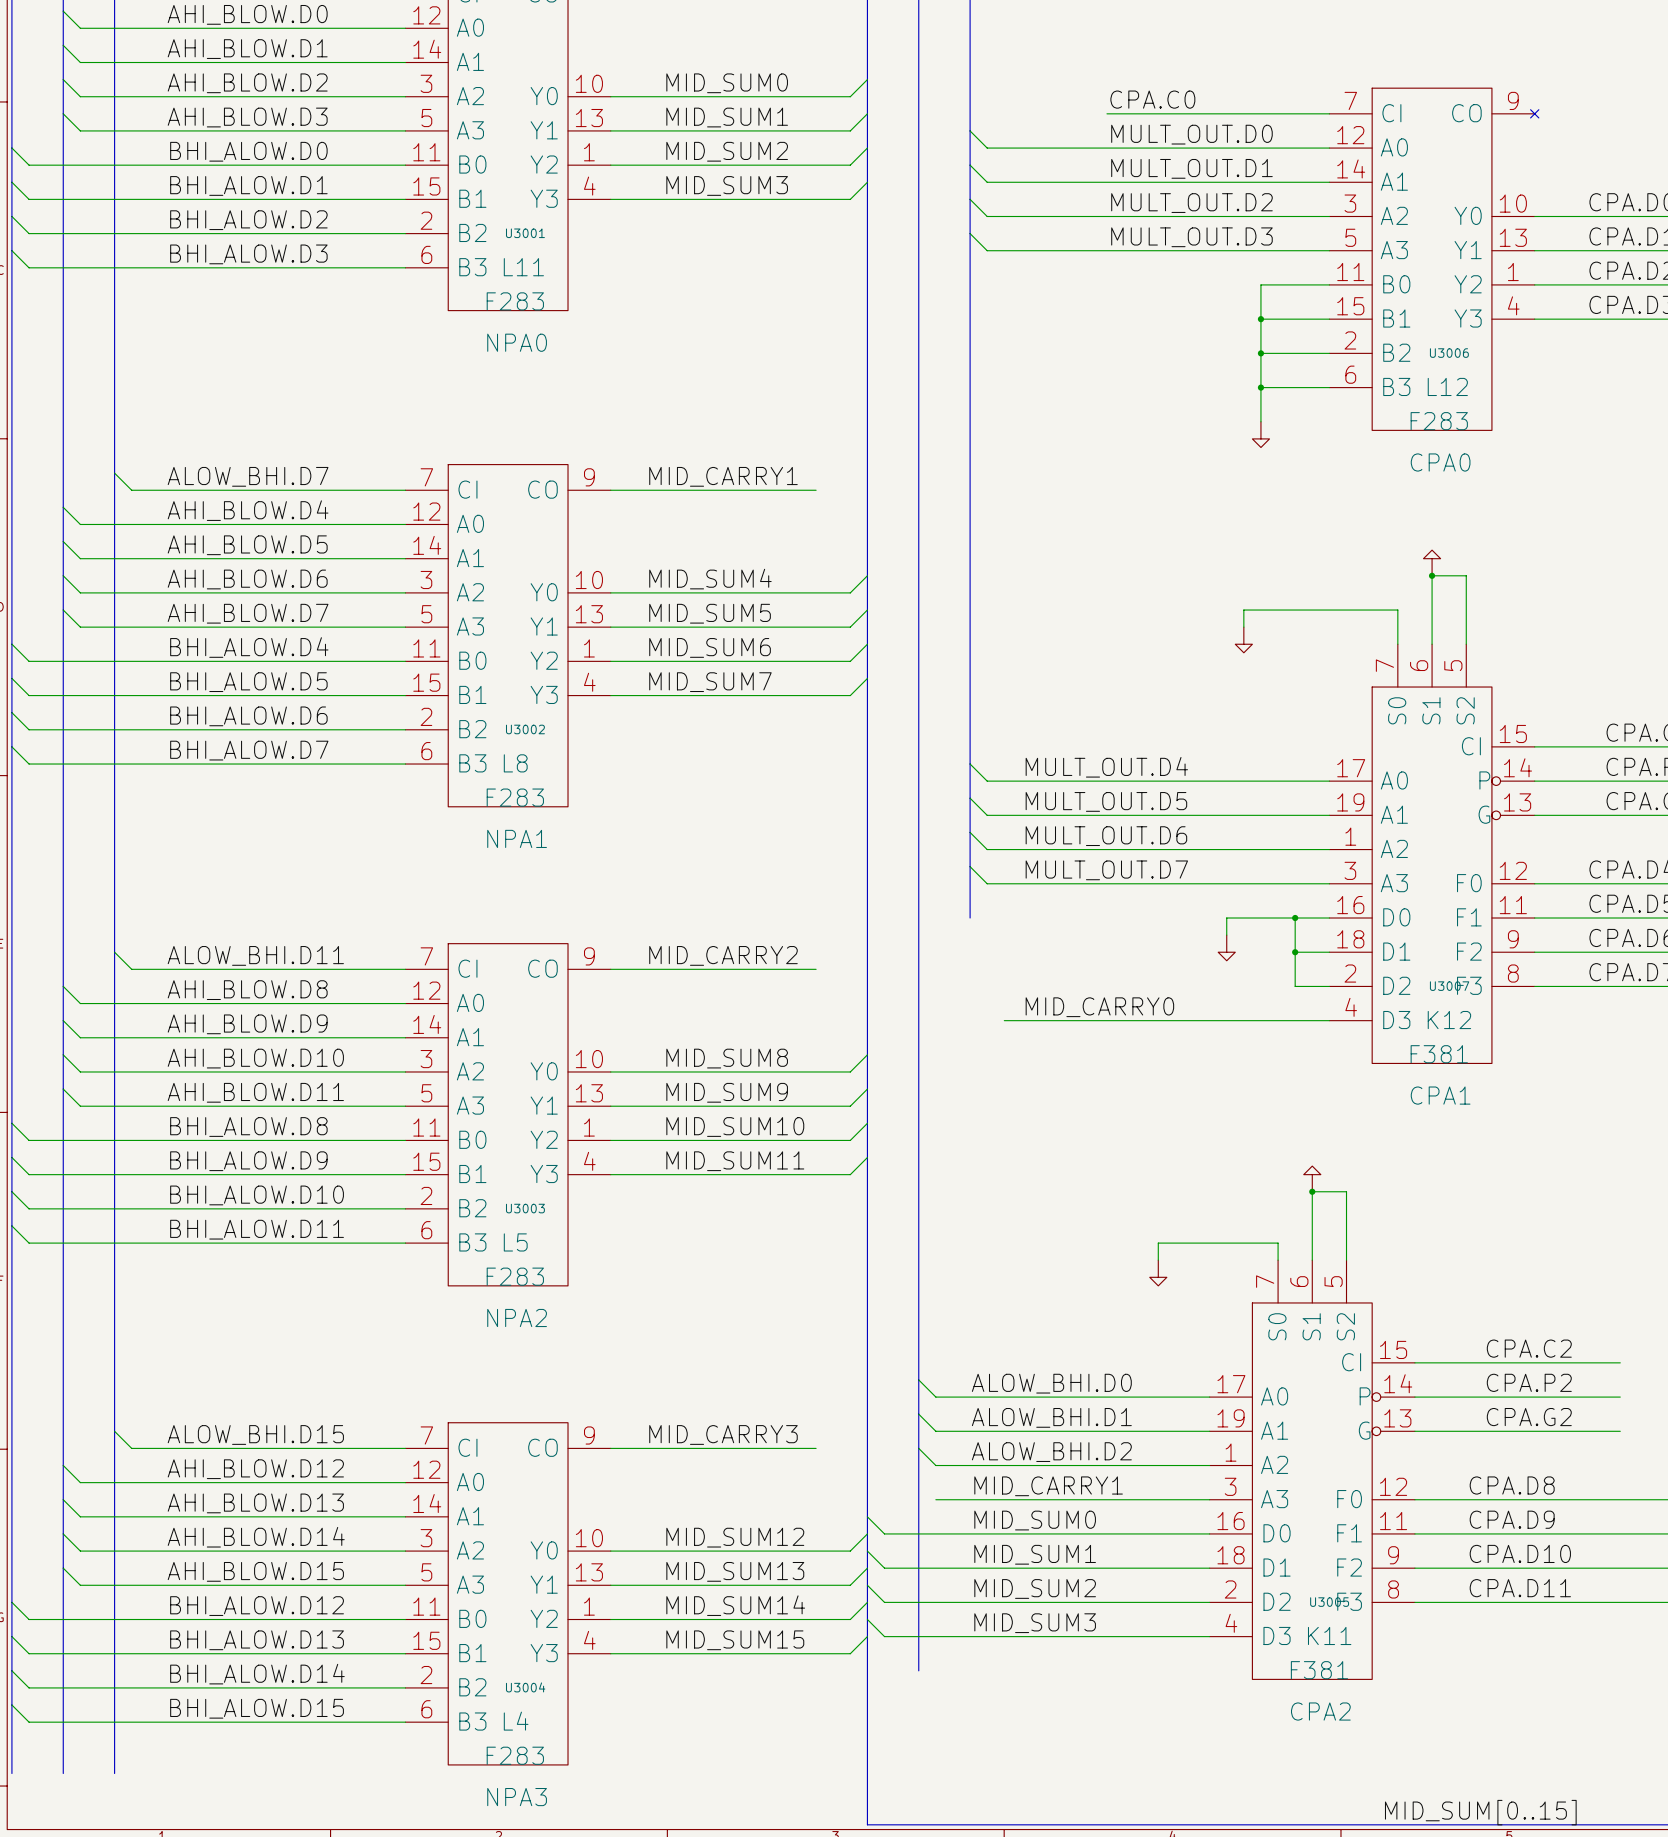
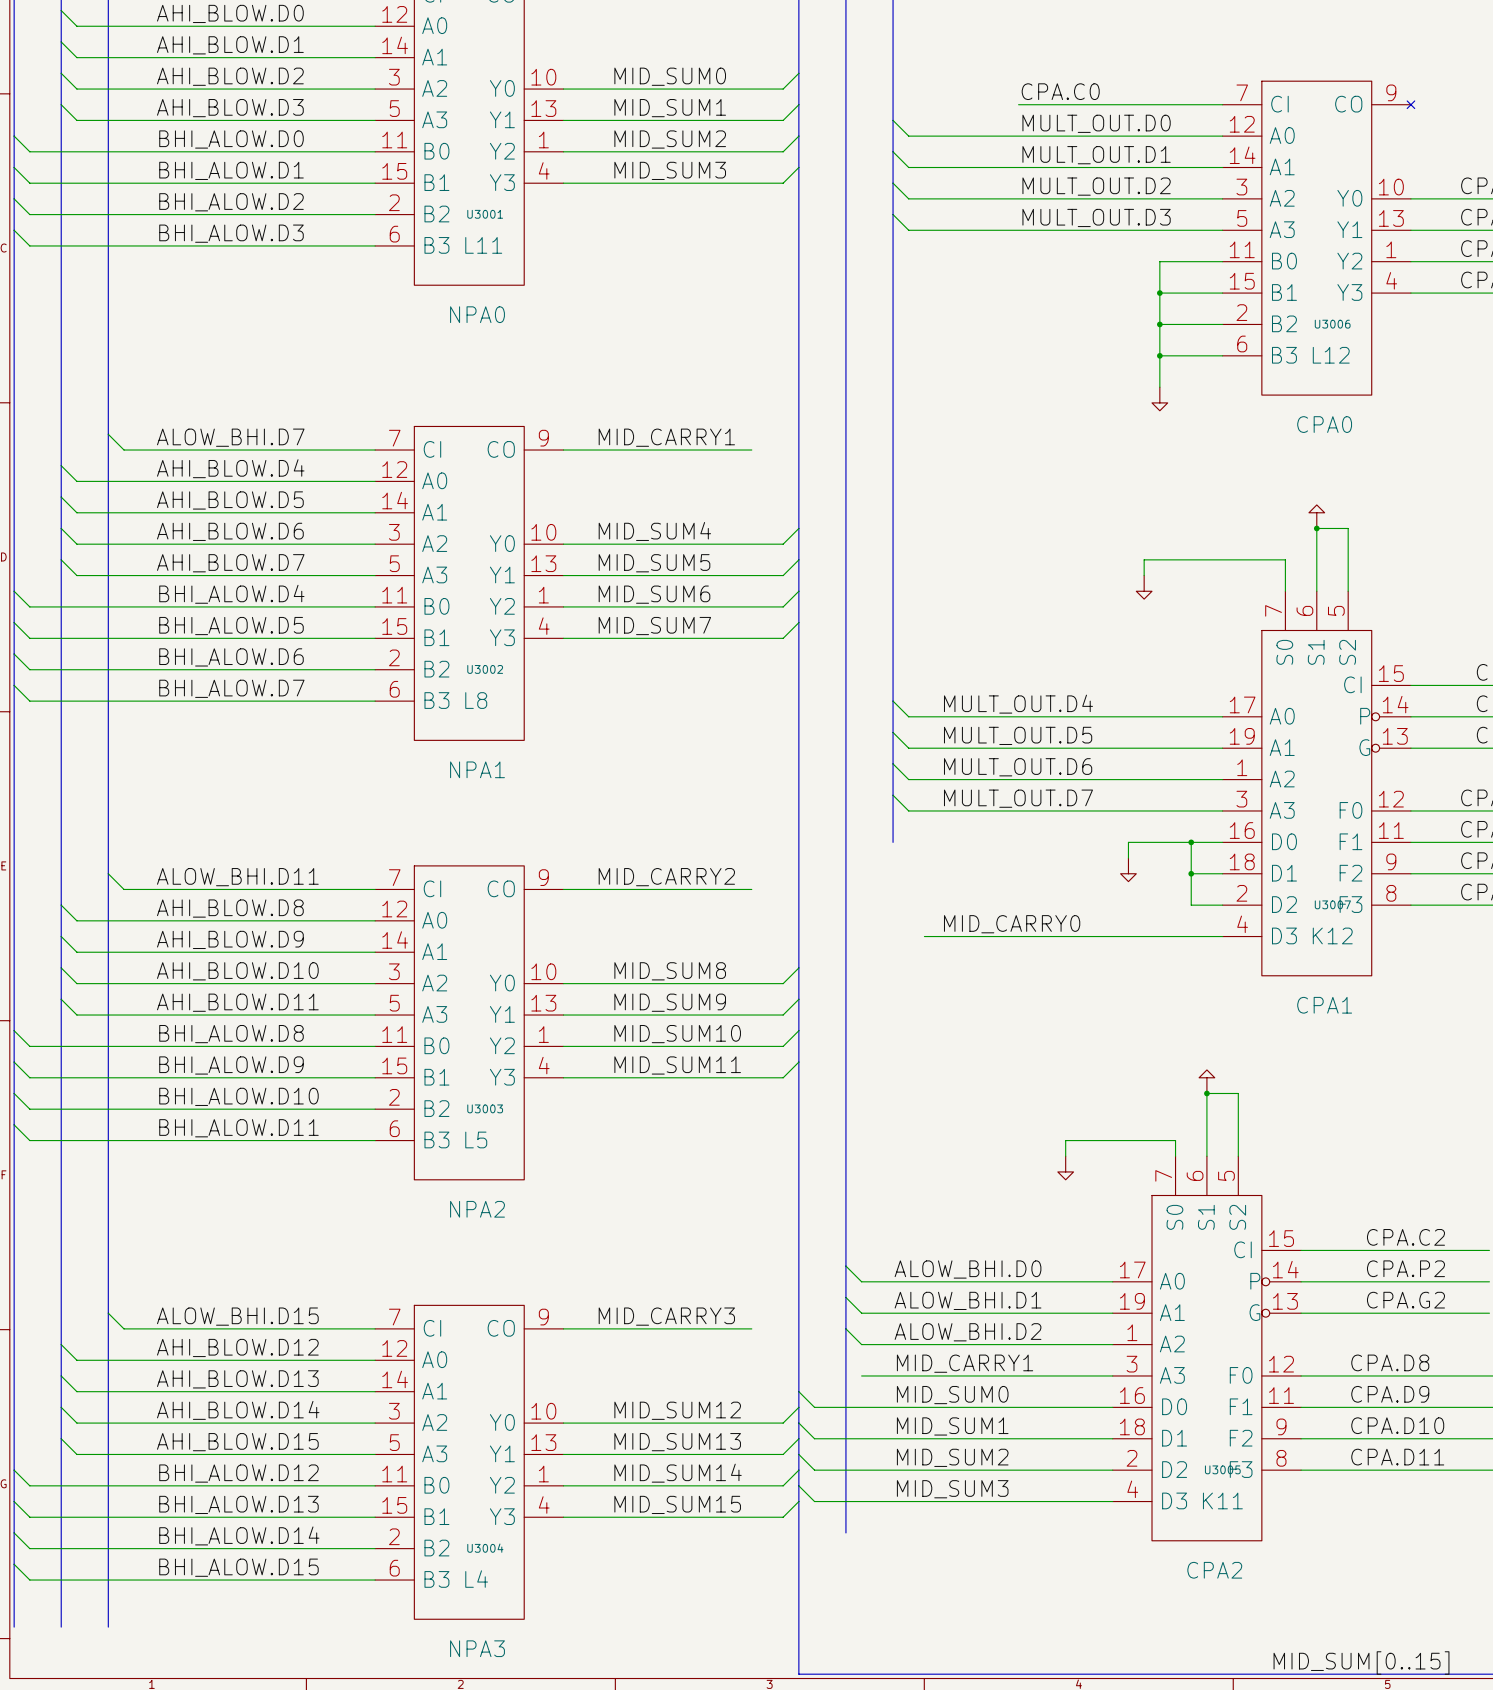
U3001 value: F283 (515, 301) -> none
U3006 value: F283 (1439, 421) -> none
U3002 value: F283 (515, 797) -> none
U3007 value: F381 (1439, 1054) -> none
U3003 value: F283 (515, 1276) -> none
U3005 value: F381 (1319, 1670) -> none
U3004 value: F283 (515, 1755) -> none

